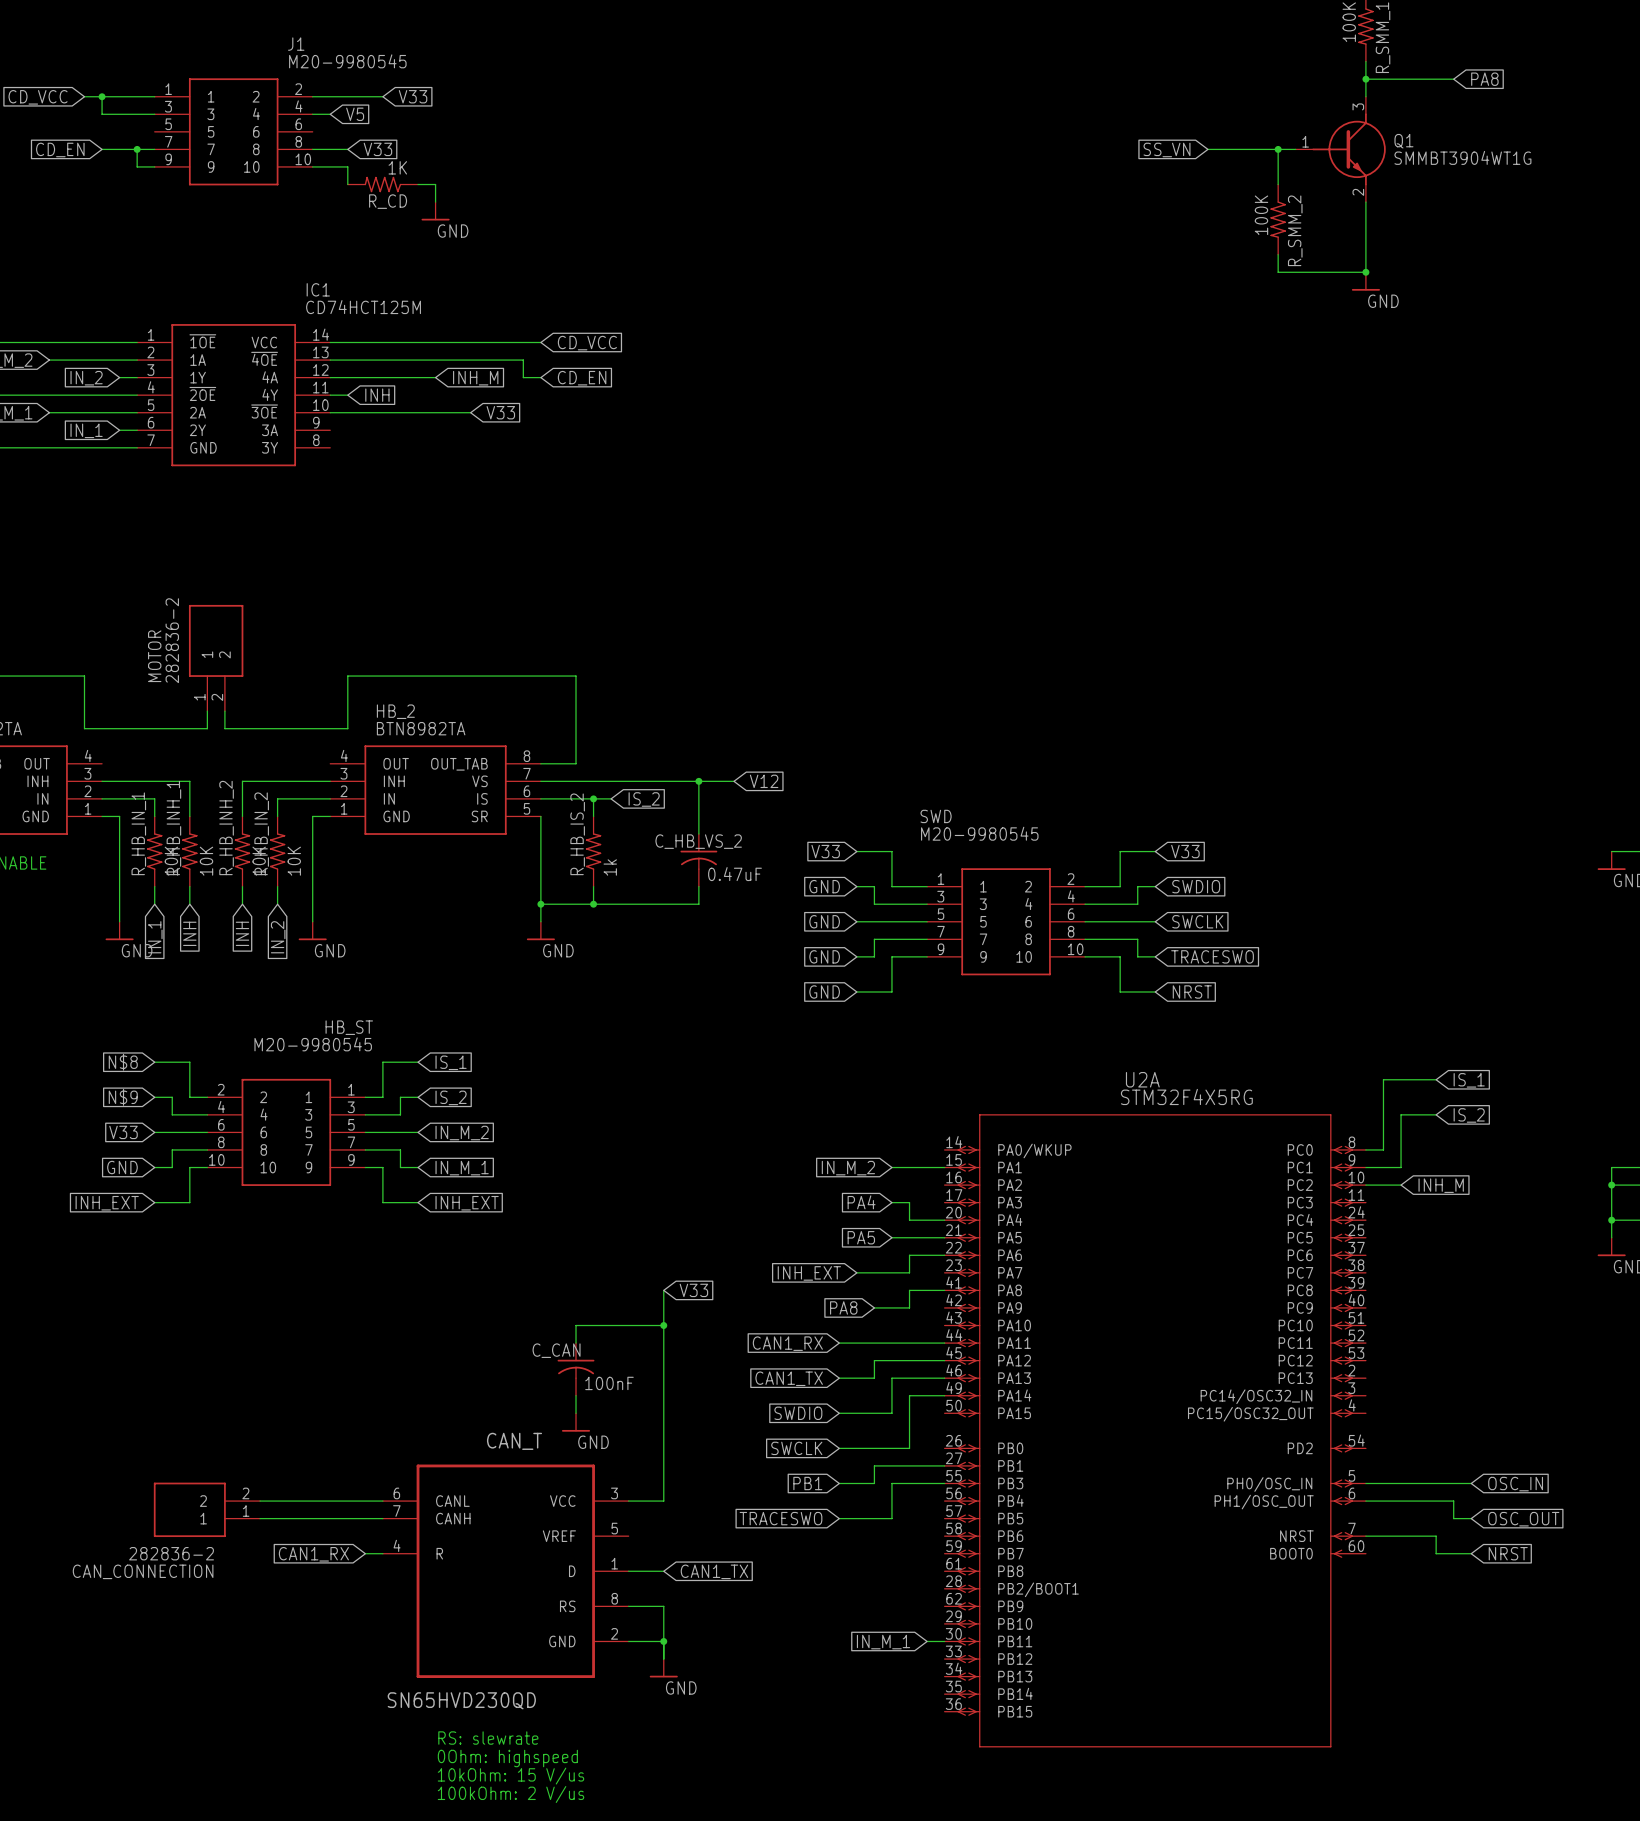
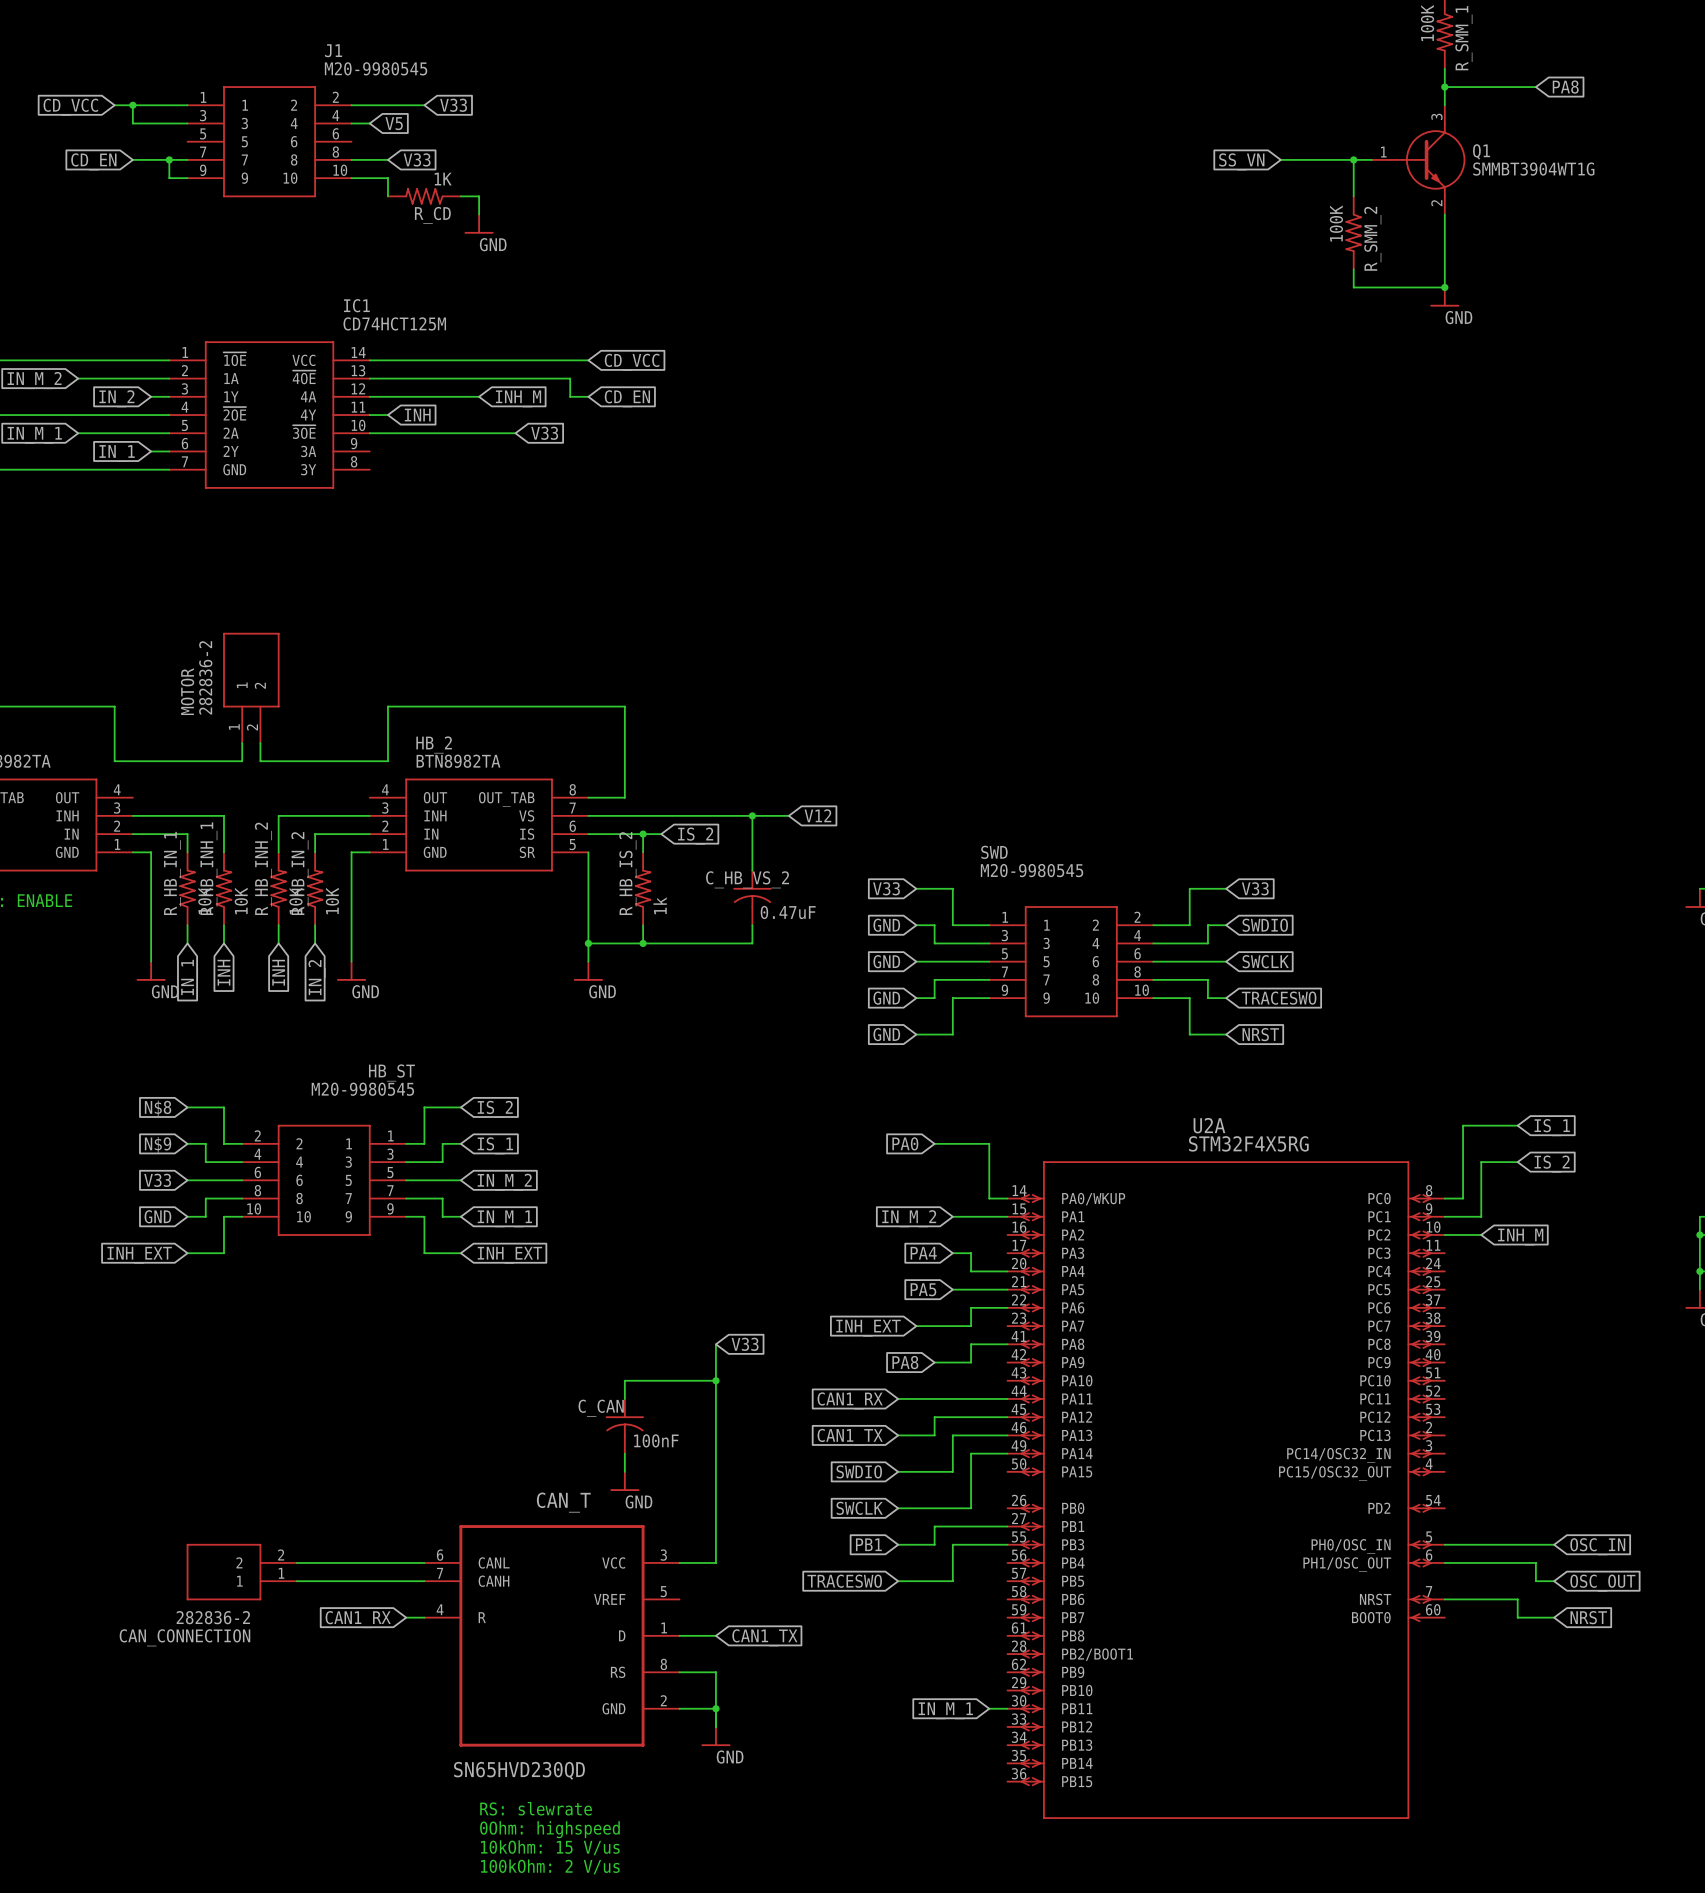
global label: IS_1 (451, 1062) -> IS_2 (495, 1109)
global label: IS_2 (451, 1097) -> IS_1 (495, 1145)
global label: none -> PA0 (905, 1143)
wire: none -> (934, 1143) (989, 1143) (989, 1198) (1007, 1198)

